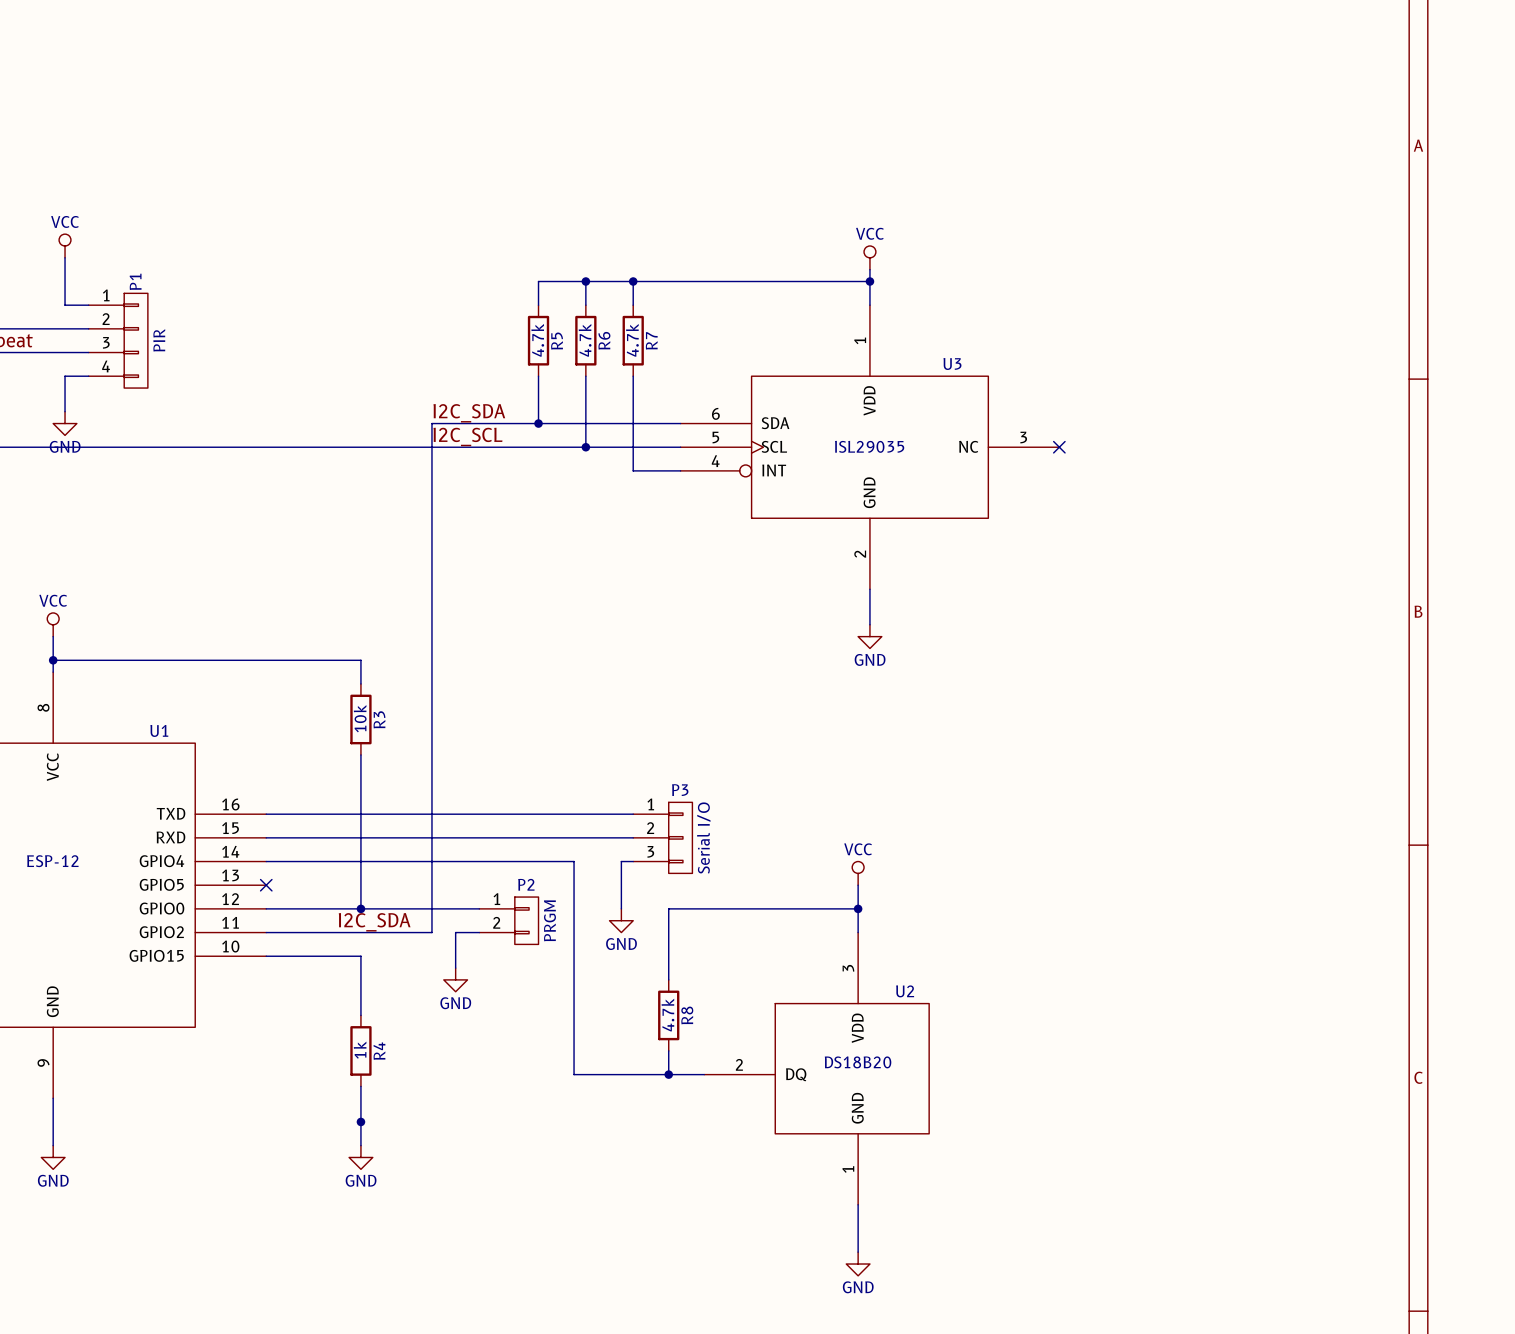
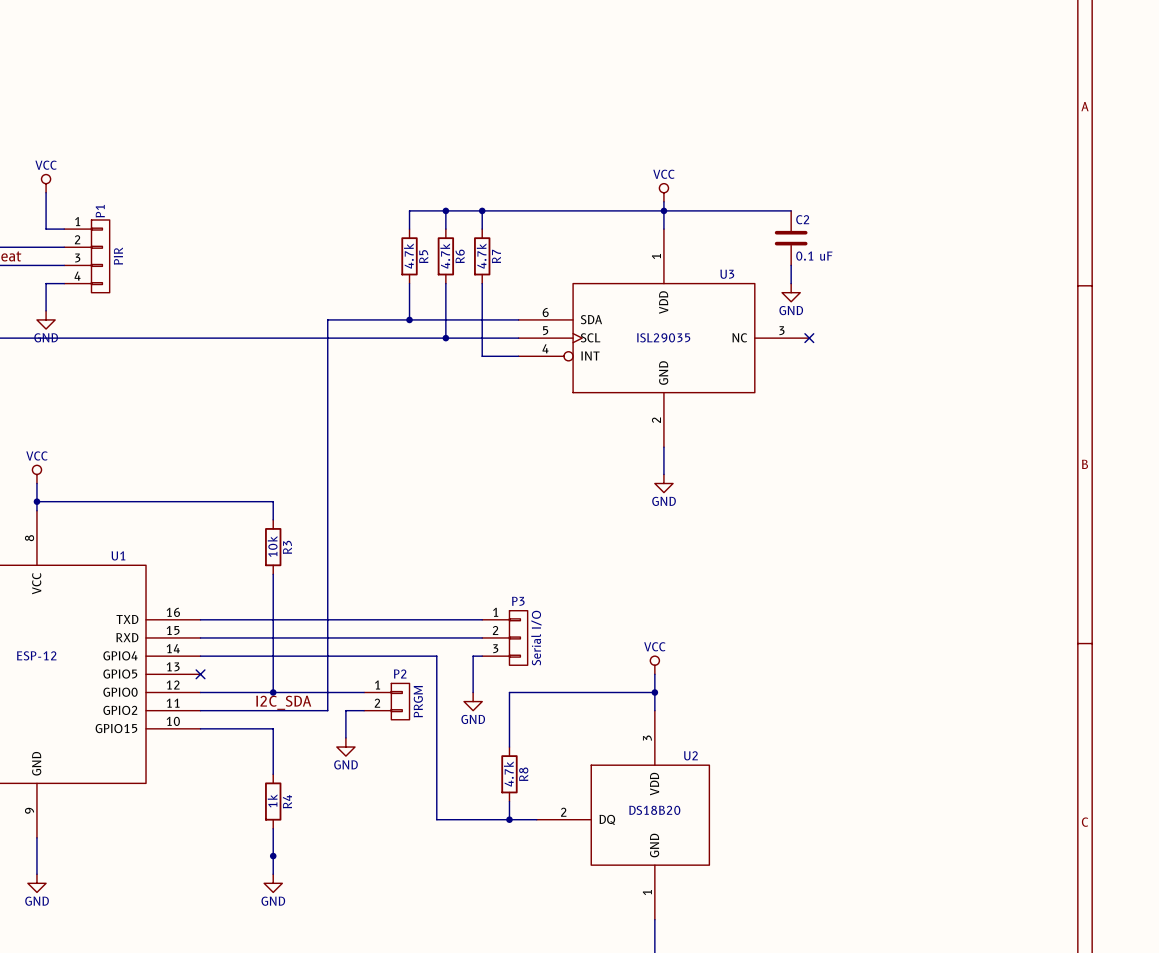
wire: none -> (663, 210) (791, 210)
C2: none -> 0.1 uF (791, 238)
wire: none -> (791, 265) (791, 283)
power symbol: none -> GND (791, 292)
label: I2C_SDA (469, 413) -> none
label: I2C_SCL (467, 436) -> none

